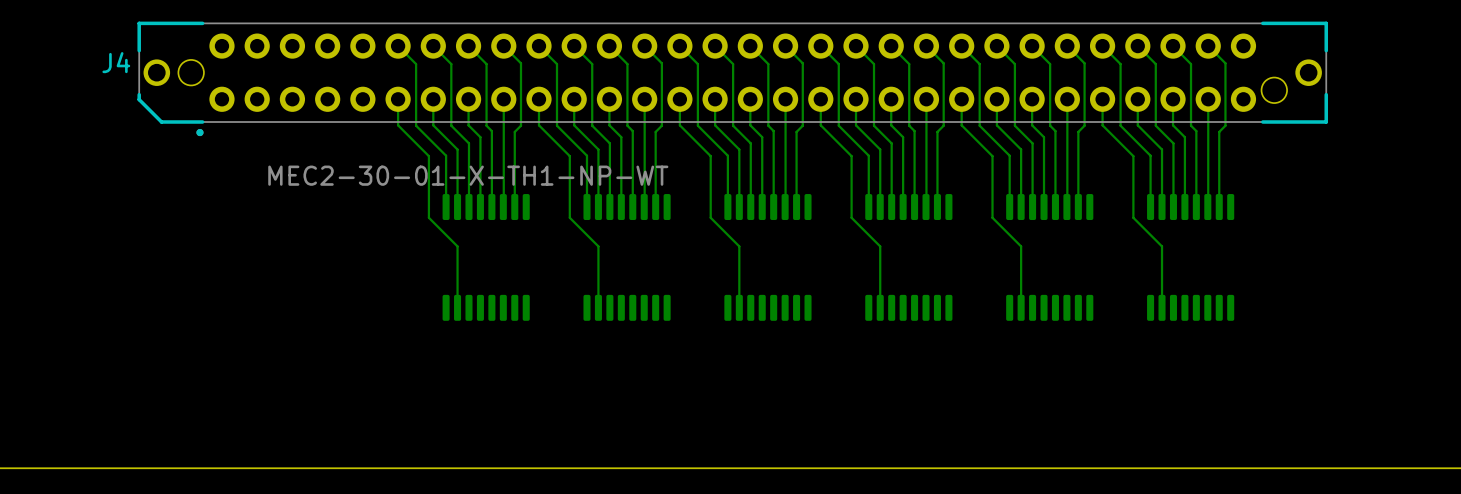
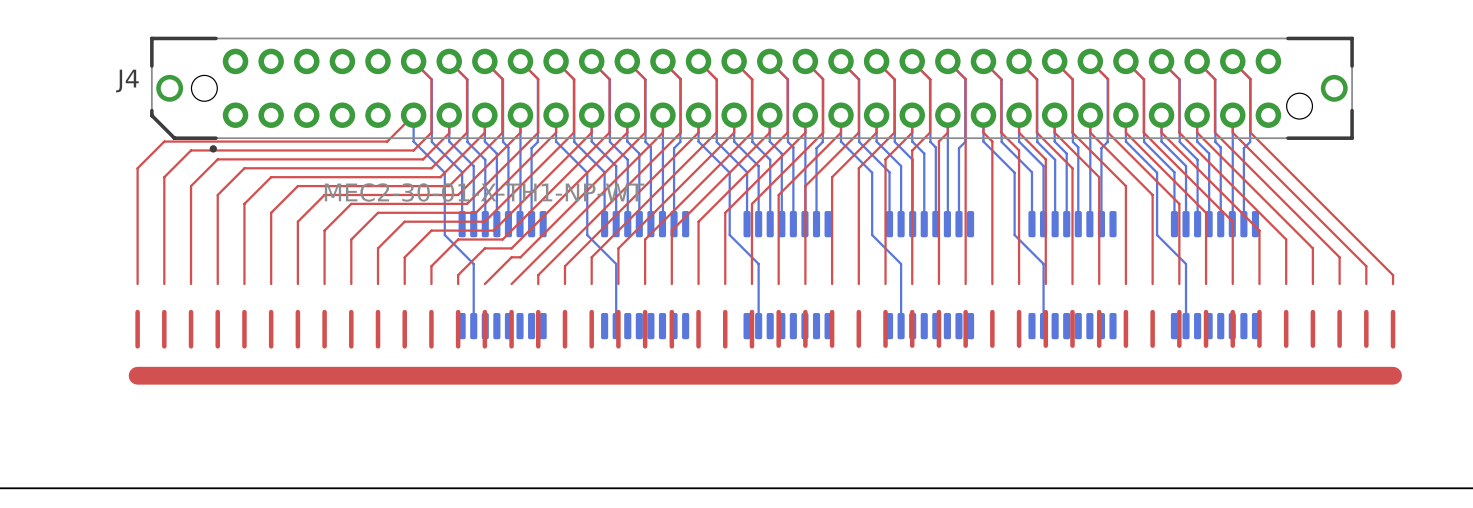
top track: none -> (413, 61) (431, 79) (431, 132) (413, 150) (191, 150) (164, 177) (164, 284)
top track: none -> (449, 61) (467, 79) (467, 132) (431, 168) (244, 168) (217, 194) (217, 284)
top track: none -> (484, 61) (502, 78) (502, 133) (449, 186) (297, 186) (271, 212) (271, 284)
top track: none -> (520, 61) (538, 79) (538, 132) (467, 203) (351, 203) (324, 230) (324, 284)
top track: none -> (556, 61) (573, 79) (573, 132) (484, 221) (404, 221) (378, 248) (378, 284)
top track: none -> (591, 61) (609, 79) (609, 132) (502, 239) (458, 239) (431, 266) (431, 284)
top track: none -> (627, 61) (645, 79) (645, 132) (520, 257) (511, 257) (484, 284)
top track: none -> (662, 61) (680, 79) (680, 132) (538, 275) (538, 284)
top track: none -> (698, 61) (716, 79) (716, 132) (591, 257) (591, 284)
top track: none -> (734, 61) (751, 79) (751, 132) (645, 239) (645, 284)
top track: none -> (769, 61) (787, 79) (787, 132) (698, 221) (698, 284)
top track: none -> (805, 61) (823, 79) (823, 132) (751, 203) (751, 284)
top track: none -> (841, 61) (858, 79) (858, 132) (805, 186) (805, 284)
top track: none -> (876, 61) (894, 79) (894, 132) (858, 168) (858, 284)
top track: none -> (912, 61) (930, 79) (930, 132) (912, 150) (912, 284)
top track: none -> (947, 61) (965, 79) (965, 284)
top track: none -> (983, 61) (1001, 79) (1001, 132) (1019, 150) (1019, 284)
top track: none -> (1019, 61) (1036, 79) (1036, 132) (1072, 168) (1072, 284)
top track: none -> (1054, 61) (1072, 79) (1072, 132) (1125, 186) (1125, 284)
top track: none -> (1090, 61) (1108, 79) (1108, 132) (1179, 203) (1179, 284)
top track: none -> (1125, 61) (1143, 79) (1143, 132) (1232, 221) (1232, 284)
top track: none -> (1161, 61) (1179, 79) (1179, 132) (1286, 239) (1286, 284)
top track: none -> (1197, 61) (1214, 79) (1214, 132) (1339, 257) (1339, 284)
top track: none -> (1232, 61) (1250, 79) (1250, 132) (1393, 275) (1393, 284)
top track: none -> (413, 115) (387, 141) (164, 141) (137, 168) (137, 284)
top track: none -> (449, 115) (449, 133) (423, 159) (217, 159) (191, 186) (191, 284)
top track: none -> (484, 115) (484, 132) (440, 177) (271, 177) (244, 203) (244, 284)
top track: none -> (520, 115) (520, 132) (458, 194) (324, 194) (297, 221) (297, 284)
top track: none -> (556, 115) (556, 132) (475, 212) (378, 212) (351, 239) (351, 284)
top track: none -> (591, 115) (591, 132) (493, 230) (431, 230) (404, 257) (404, 284)
top track: none -> (627, 115) (627, 132) (511, 248) (484, 248) (458, 275) (458, 284)
top track: none -> (662, 115) (662, 132) (511, 284)
top track: none -> (698, 115) (698, 132) (564, 266) (564, 284)
top track: none -> (734, 115) (734, 132) (618, 248) (618, 284)
top track: none -> (769, 115) (769, 132) (671, 230) (671, 284)
top track: none -> (805, 115) (805, 132) (725, 212) (725, 284)
top track: none -> (841, 115) (841, 132) (778, 194) (778, 284)
top track: none -> (876, 115) (876, 132) (832, 177) (832, 284)
top track: none -> (912, 115) (912, 132) (885, 159) (885, 284)
top track: none -> (947, 115) (947, 132) (938, 141) (938, 284)
top track: none -> (983, 115) (983, 132) (992, 141) (992, 284)
top track: none -> (1019, 115) (1019, 132) (1045, 159) (1045, 284)
top track: none -> (1054, 115) (1054, 132) (1099, 177) (1099, 284)
top track: none -> (1090, 115) (1090, 132) (1152, 194) (1152, 284)
top track: none -> (1125, 115) (1125, 132) (1206, 212) (1206, 284)
top track: none -> (1161, 115) (1161, 132) (1259, 230) (1259, 284)
top track: none -> (1197, 115) (1197, 132) (1312, 248) (1312, 284)
top track: none -> (1232, 115) (1232, 132) (1366, 266) (1366, 284)
top track: none -> (137, 312) (137, 346)
top track: none -> (164, 312) (164, 346)
top track: none -> (191, 312) (191, 346)
top track: none -> (217, 312) (217, 346)
top track: none -> (244, 312) (244, 346)
top track: none -> (271, 312) (271, 346)
top track: none -> (297, 312) (297, 346)
top track: none -> (324, 312) (324, 346)
top track: none -> (351, 312) (351, 346)
top track: none -> (378, 312) (378, 346)
top track: none -> (404, 312) (404, 346)
top track: none -> (431, 312) (431, 346)
top track: none -> (458, 312) (458, 346)
top track: none -> (484, 312) (484, 346)
top track: none -> (511, 312) (511, 346)
top track: none -> (538, 312) (538, 346)
top track: none -> (564, 312) (564, 346)
top track: none -> (591, 312) (591, 346)
top track: none -> (618, 312) (618, 346)
top track: none -> (645, 312) (645, 346)
top track: none -> (671, 312) (671, 346)
top track: none -> (698, 312) (698, 346)
top track: none -> (725, 312) (725, 346)
top track: none -> (751, 312) (751, 346)
top track: none -> (778, 312) (778, 345)
top track: none -> (805, 312) (805, 345)
top track: none -> (832, 312) (832, 345)
top track: none -> (858, 312) (858, 345)
top track: none -> (885, 312) (885, 345)
top track: none -> (912, 312) (912, 345)
top track: none -> (938, 312) (938, 345)
top track: none -> (965, 312) (965, 345)
top track: none -> (992, 312) (992, 345)
top track: none -> (1019, 312) (1019, 345)
top track: none -> (1045, 312) (1045, 345)
top track: none -> (1072, 312) (1072, 345)
top track: none -> (1099, 312) (1099, 345)
top track: none -> (1125, 312) (1125, 345)
top track: none -> (1152, 312) (1152, 345)
top track: none -> (1179, 312) (1179, 345)
top track: none -> (1206, 312) (1206, 345)
top track: none -> (1232, 312) (1232, 345)
top track: none -> (1259, 312) (1259, 345)
top track: none -> (1286, 312) (1286, 345)
top track: none -> (1312, 312) (1312, 345)
top track: none -> (1339, 312) (1339, 345)
top track: none -> (1366, 312) (1366, 345)
top track: none -> (1393, 312) (1393, 346)
top track: none -> (137, 375) (1393, 375)

